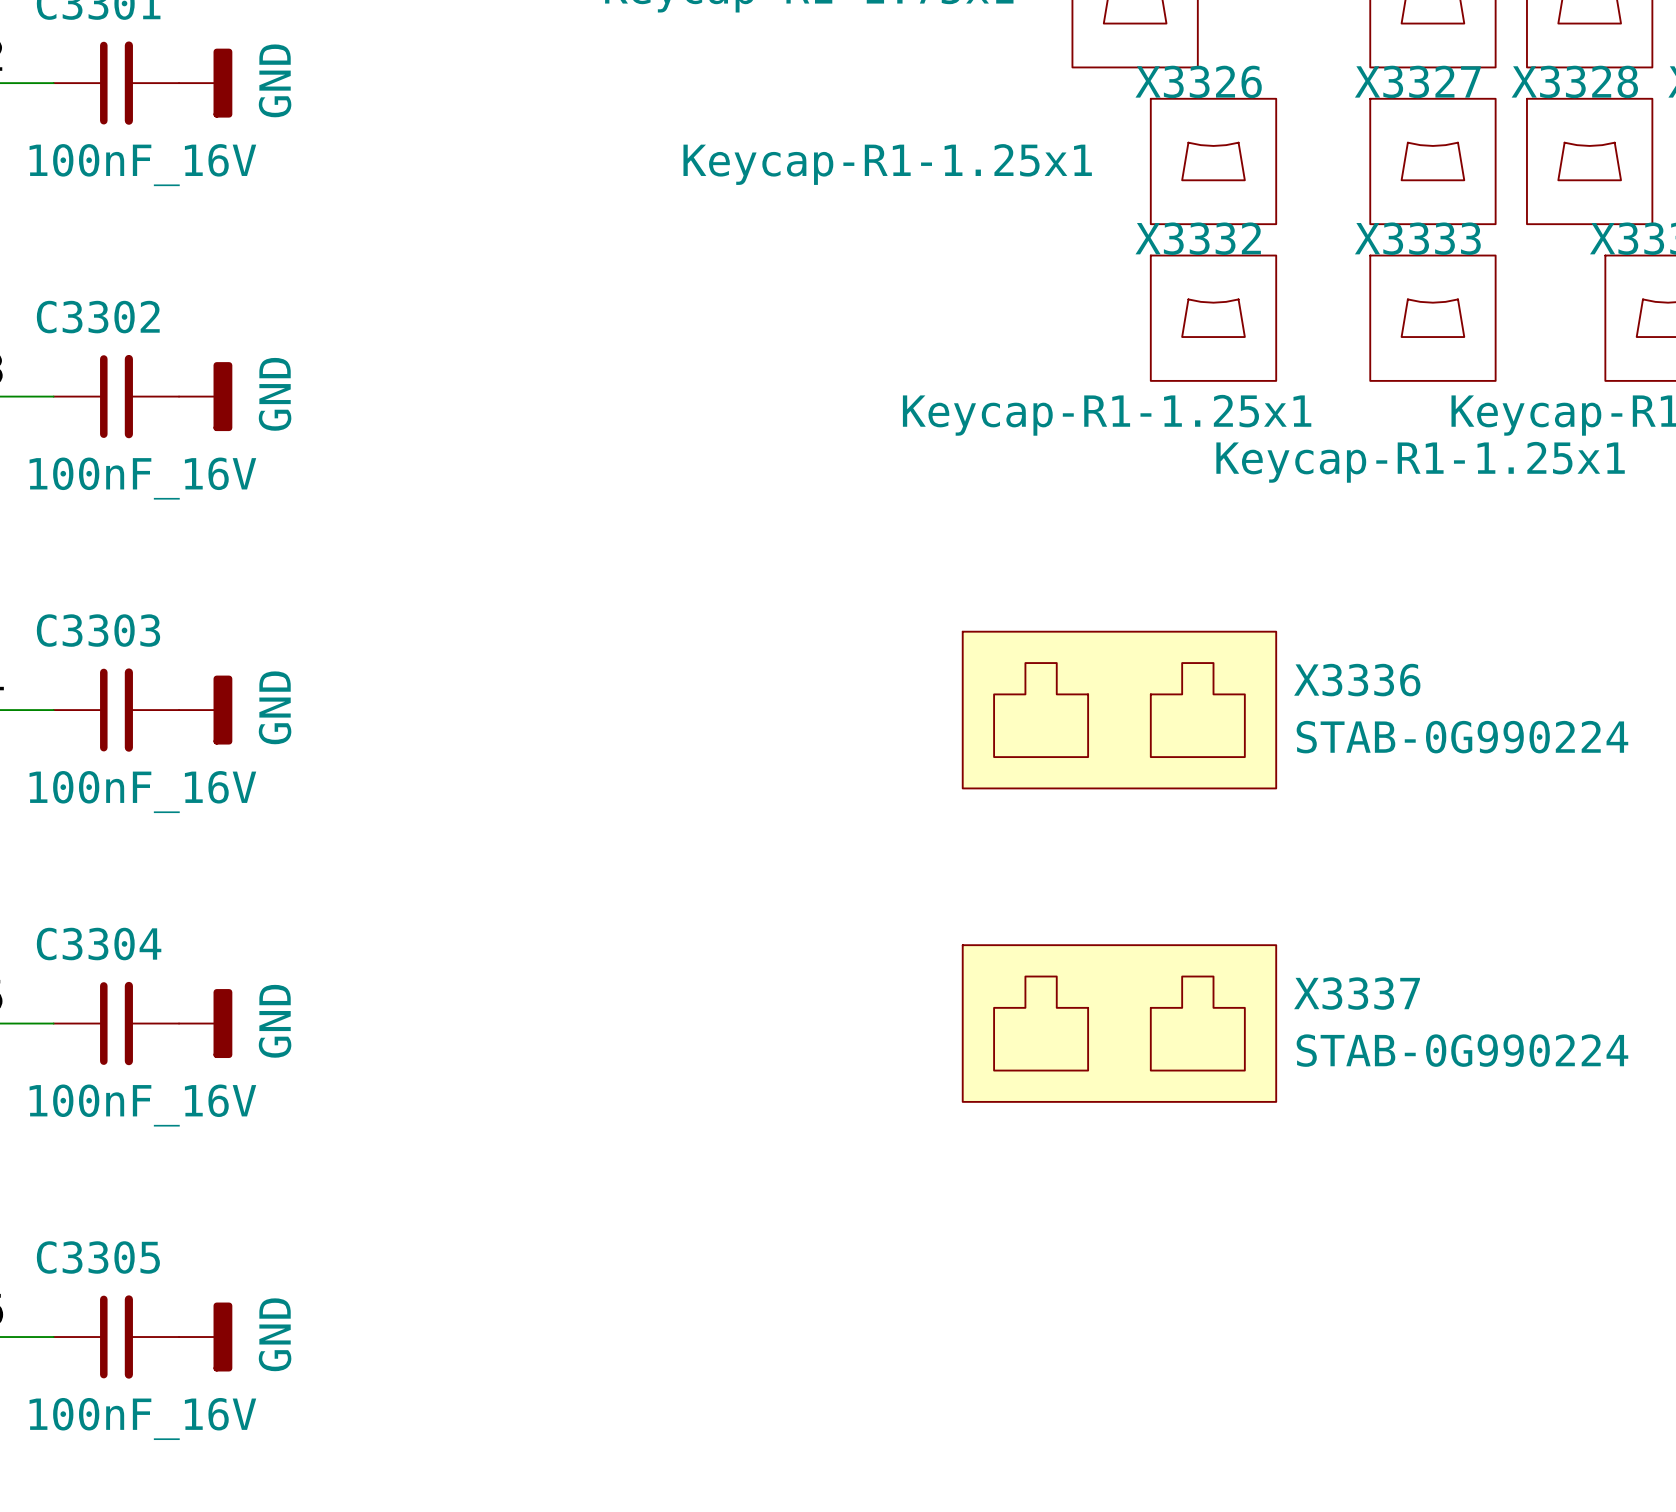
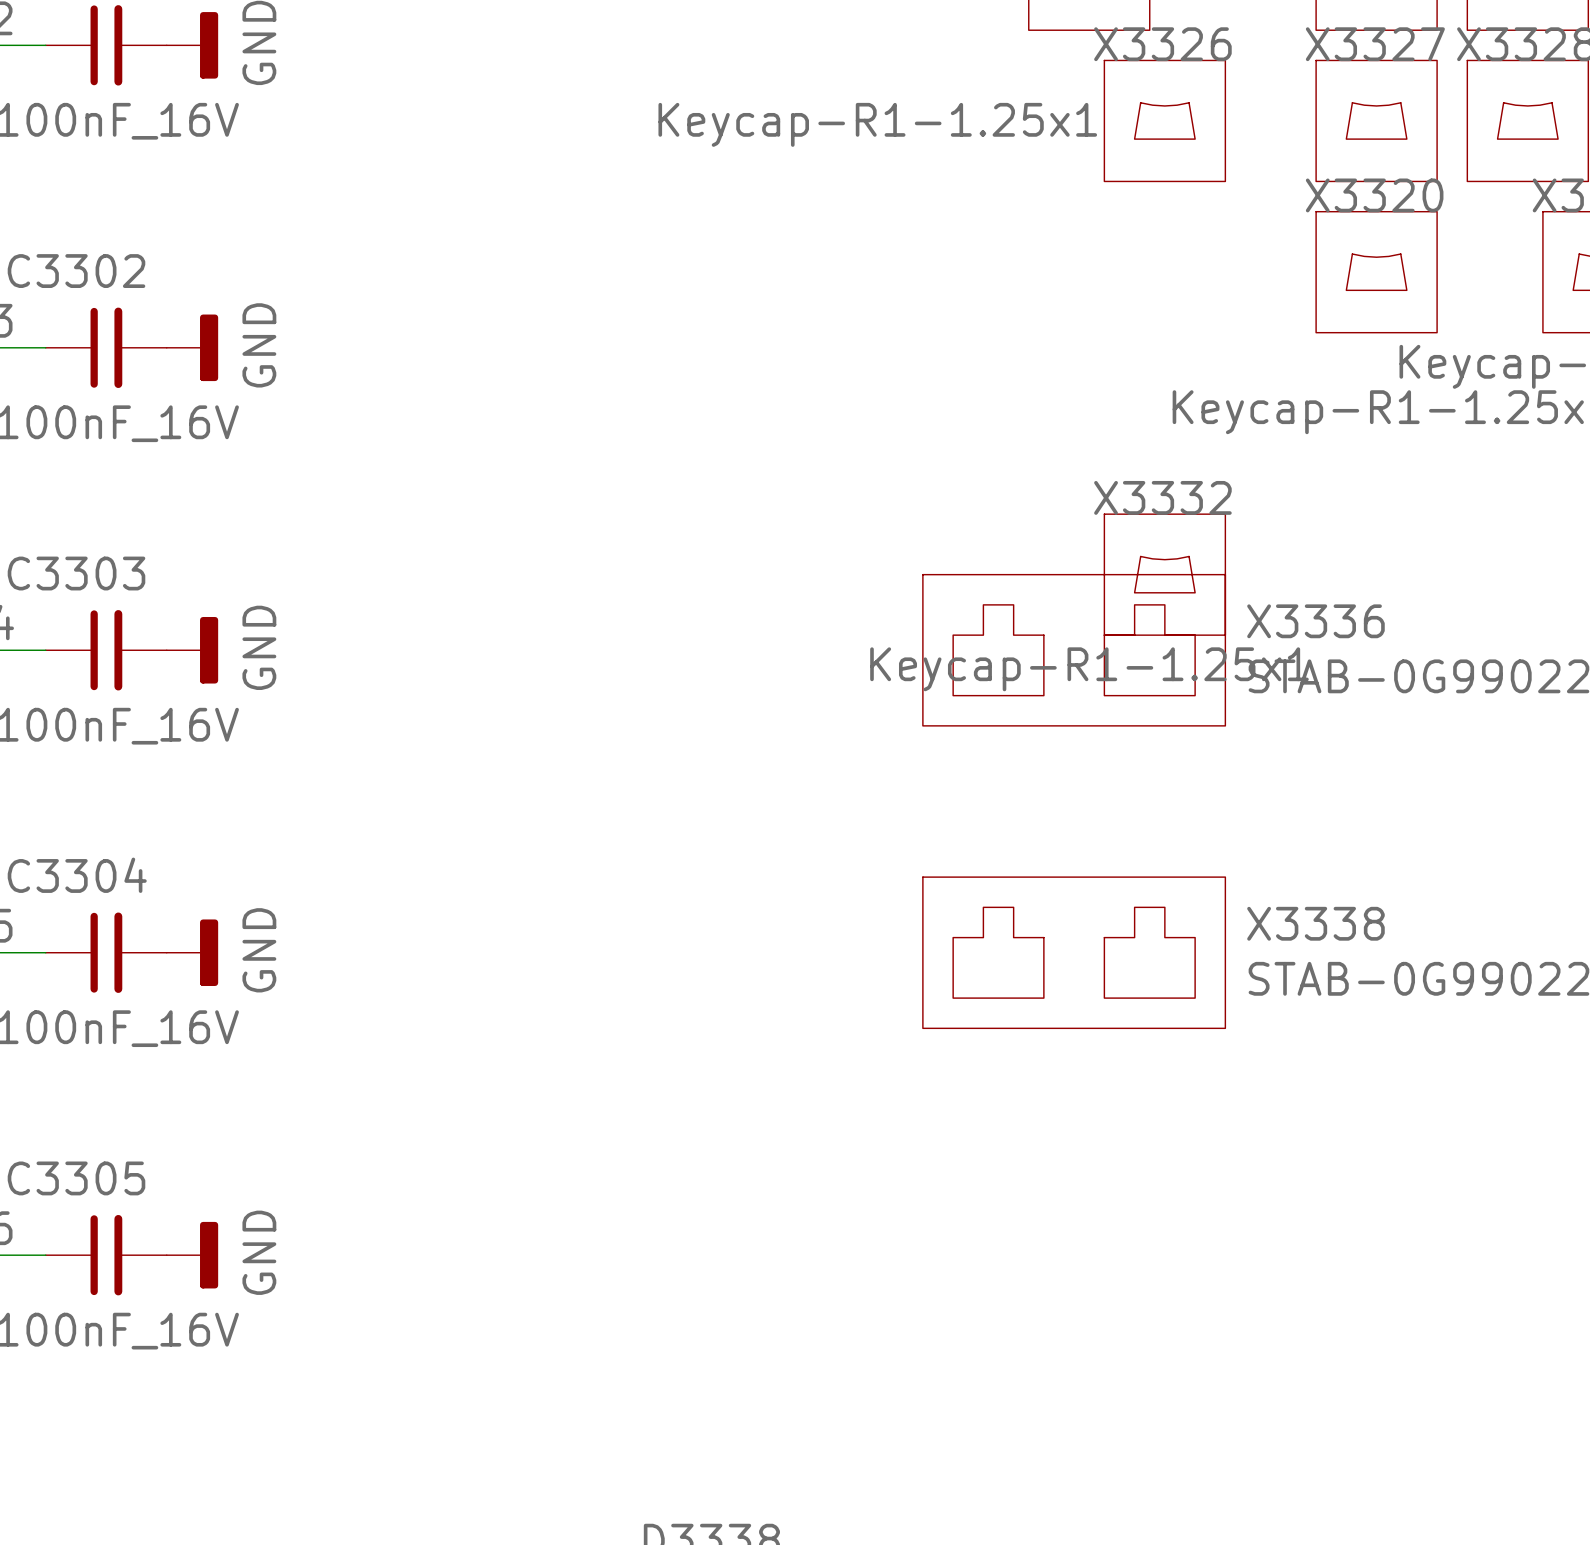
X3333 name: X3333 (1417, 238) -> X3320 (1374, 195)
X3332 position: (1213, 318) -> (1164, 574)
X3337 name: X3337 (1357, 993) -> X3338 (1315, 923)

